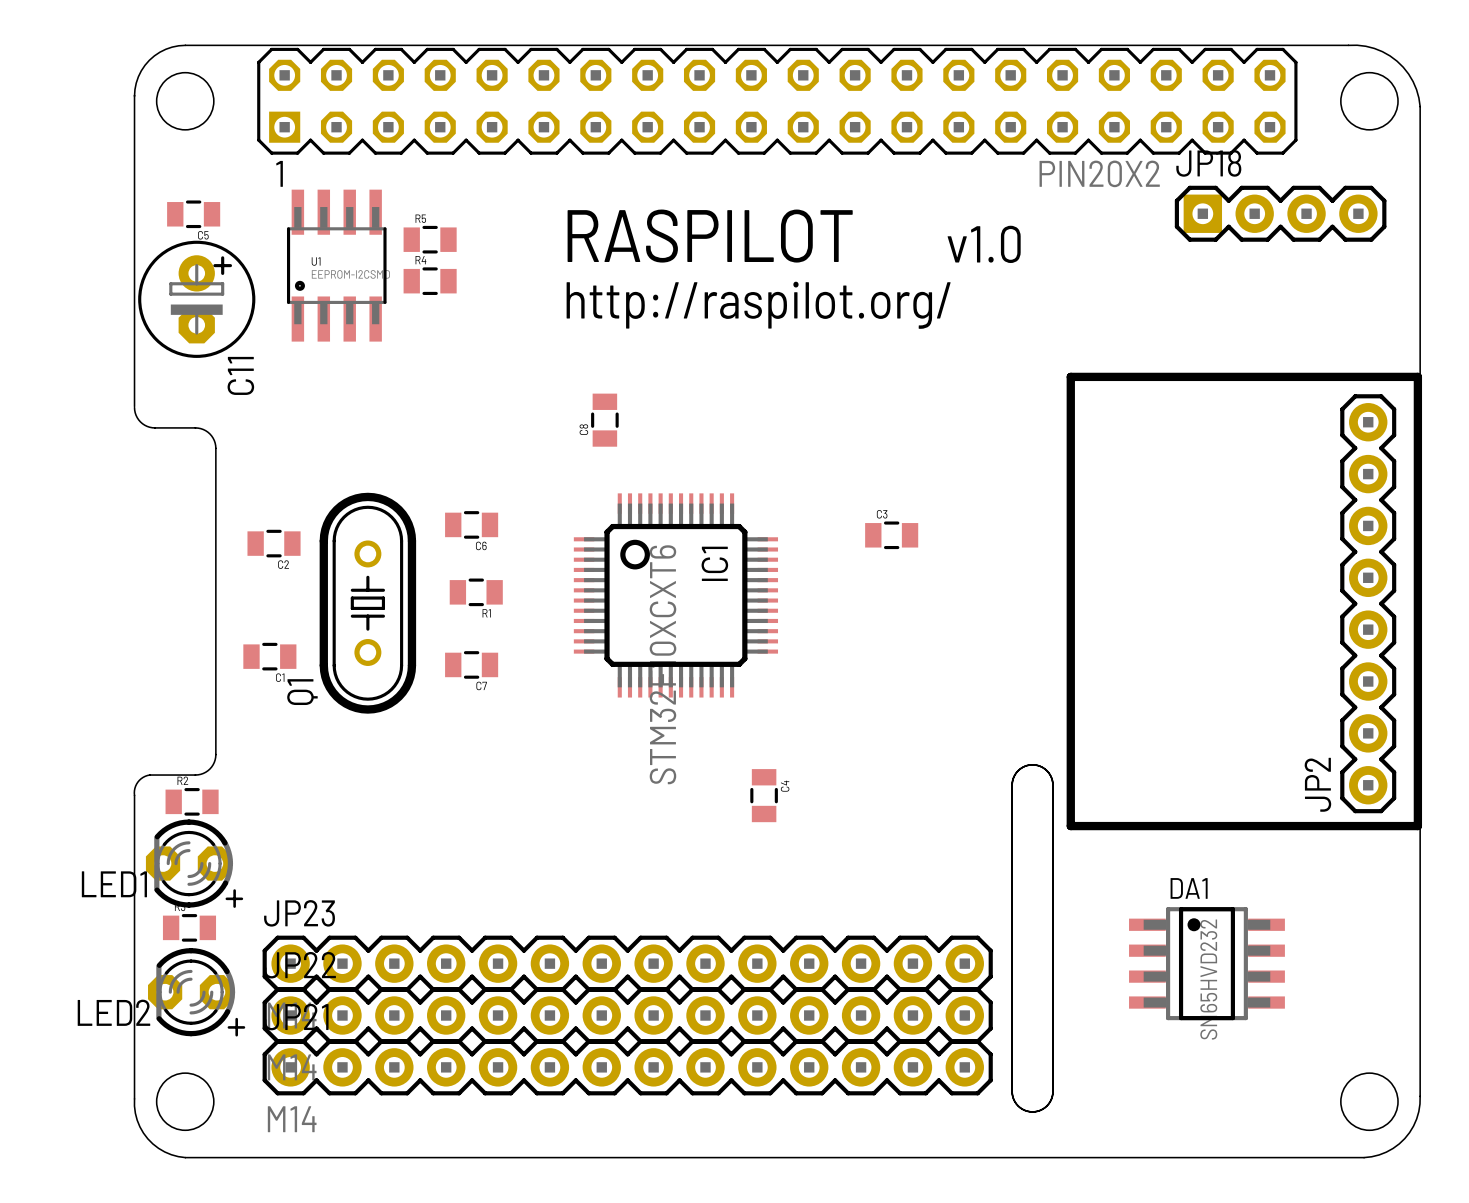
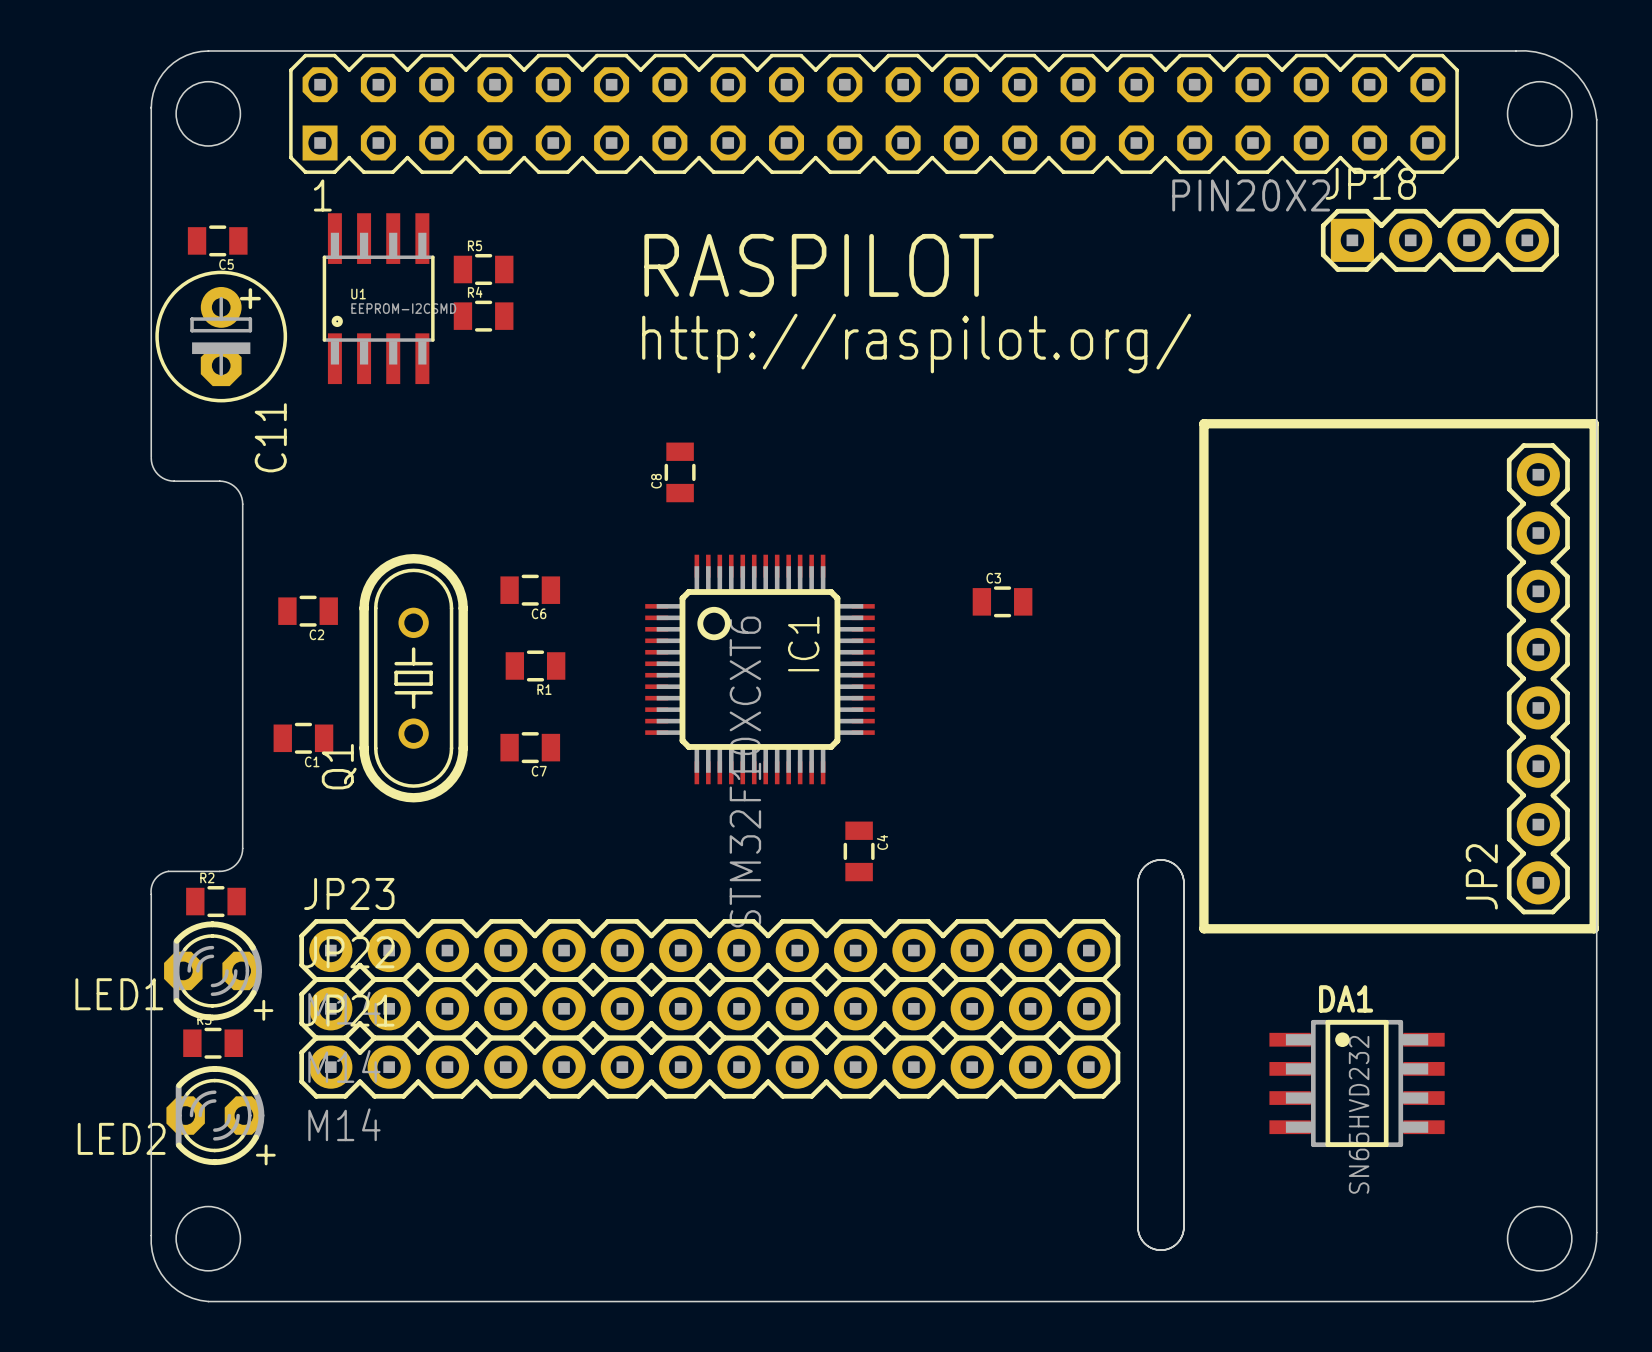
text: v1.0 (984, 244) -> none
C4 position: (764, 795) -> (859, 851)
JP23 position: (627, 963) -> (709, 950)
JP22 position: (627, 1015) -> (709, 1008)
JP21 position: (627, 1067) -> (709, 1067)

